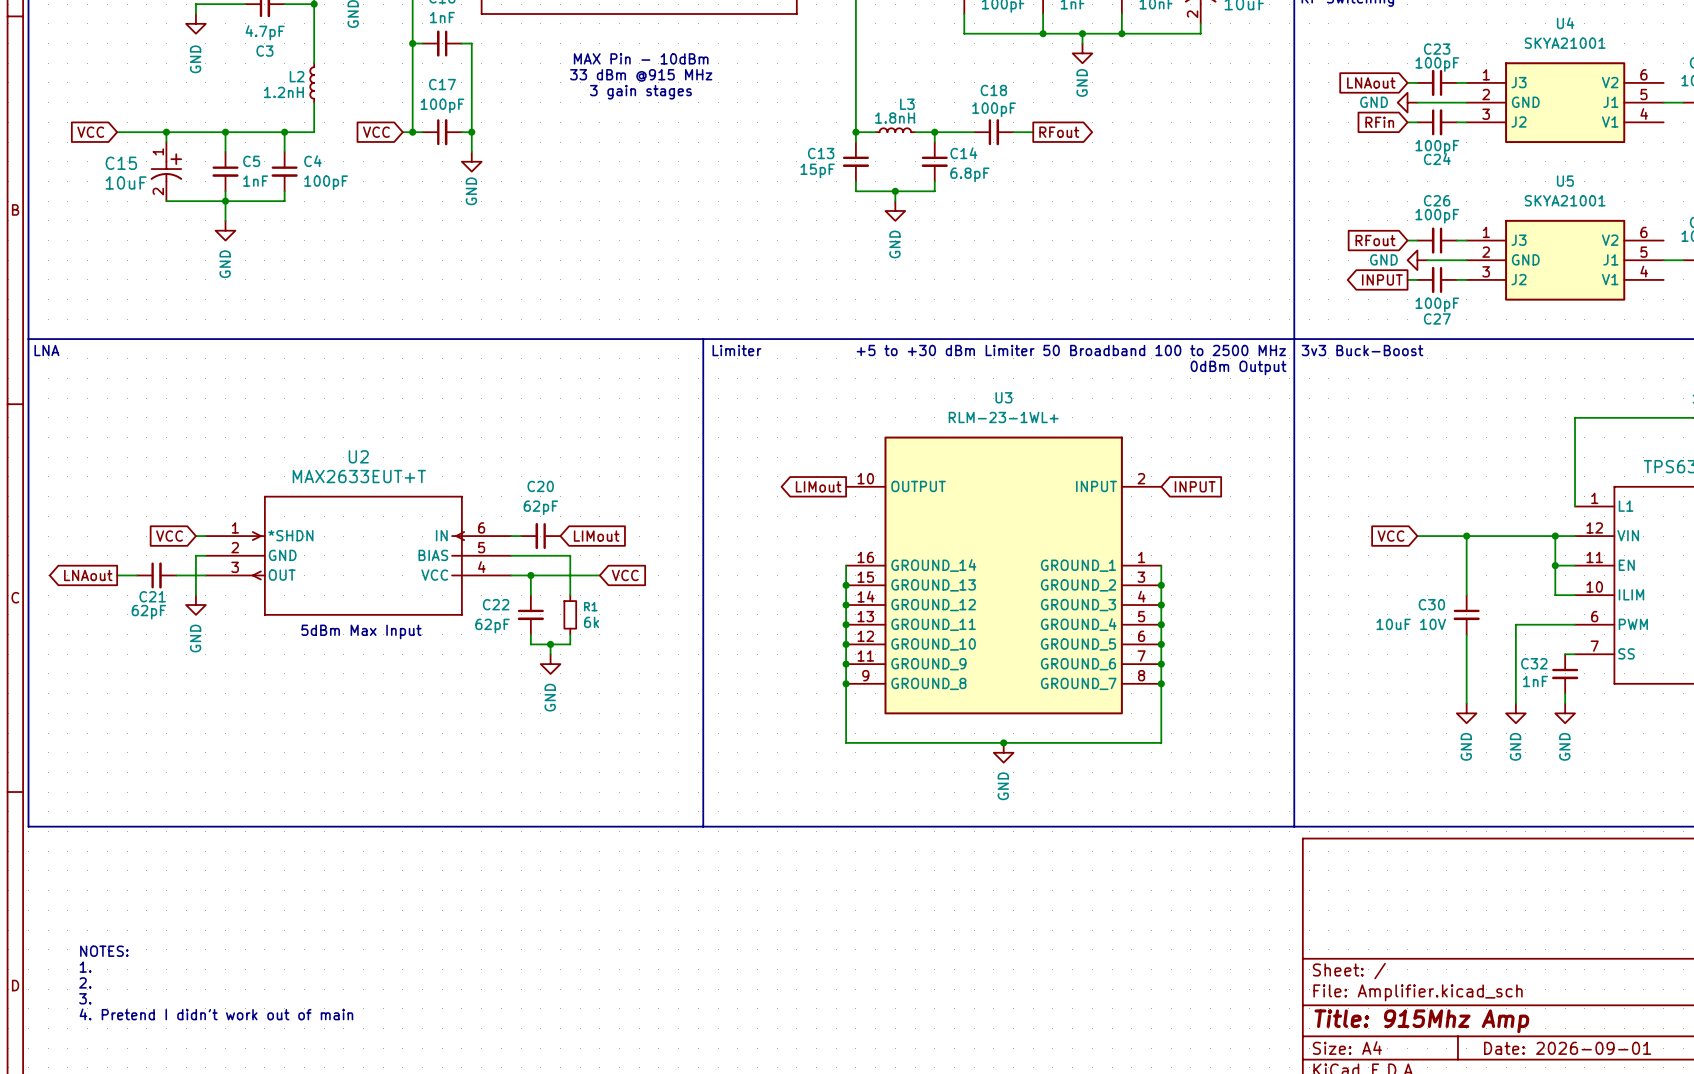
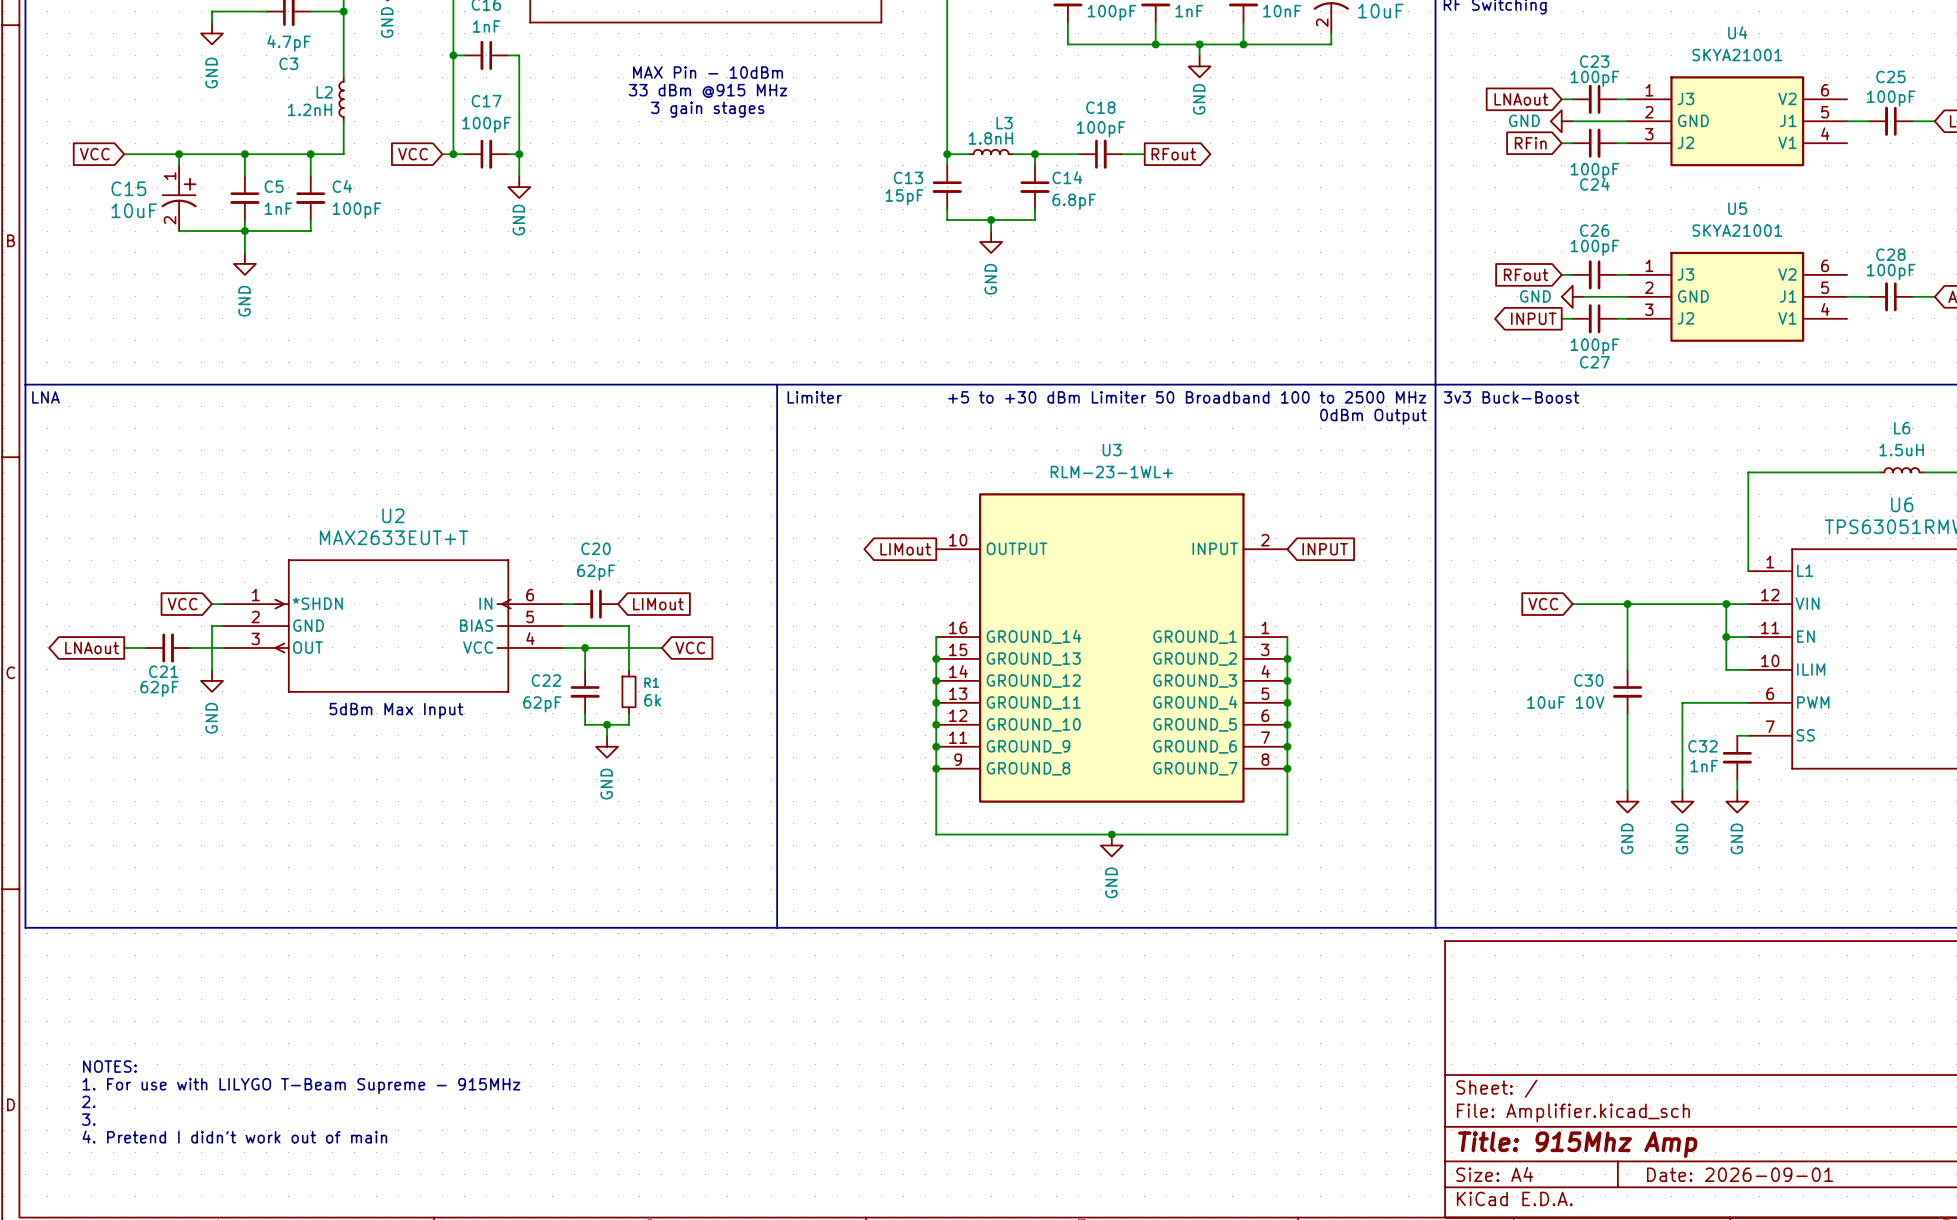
text: 1. (85, 967) -> 1. For use with LILYGO T-Beam Supreme - 915MHz (301, 1086)

